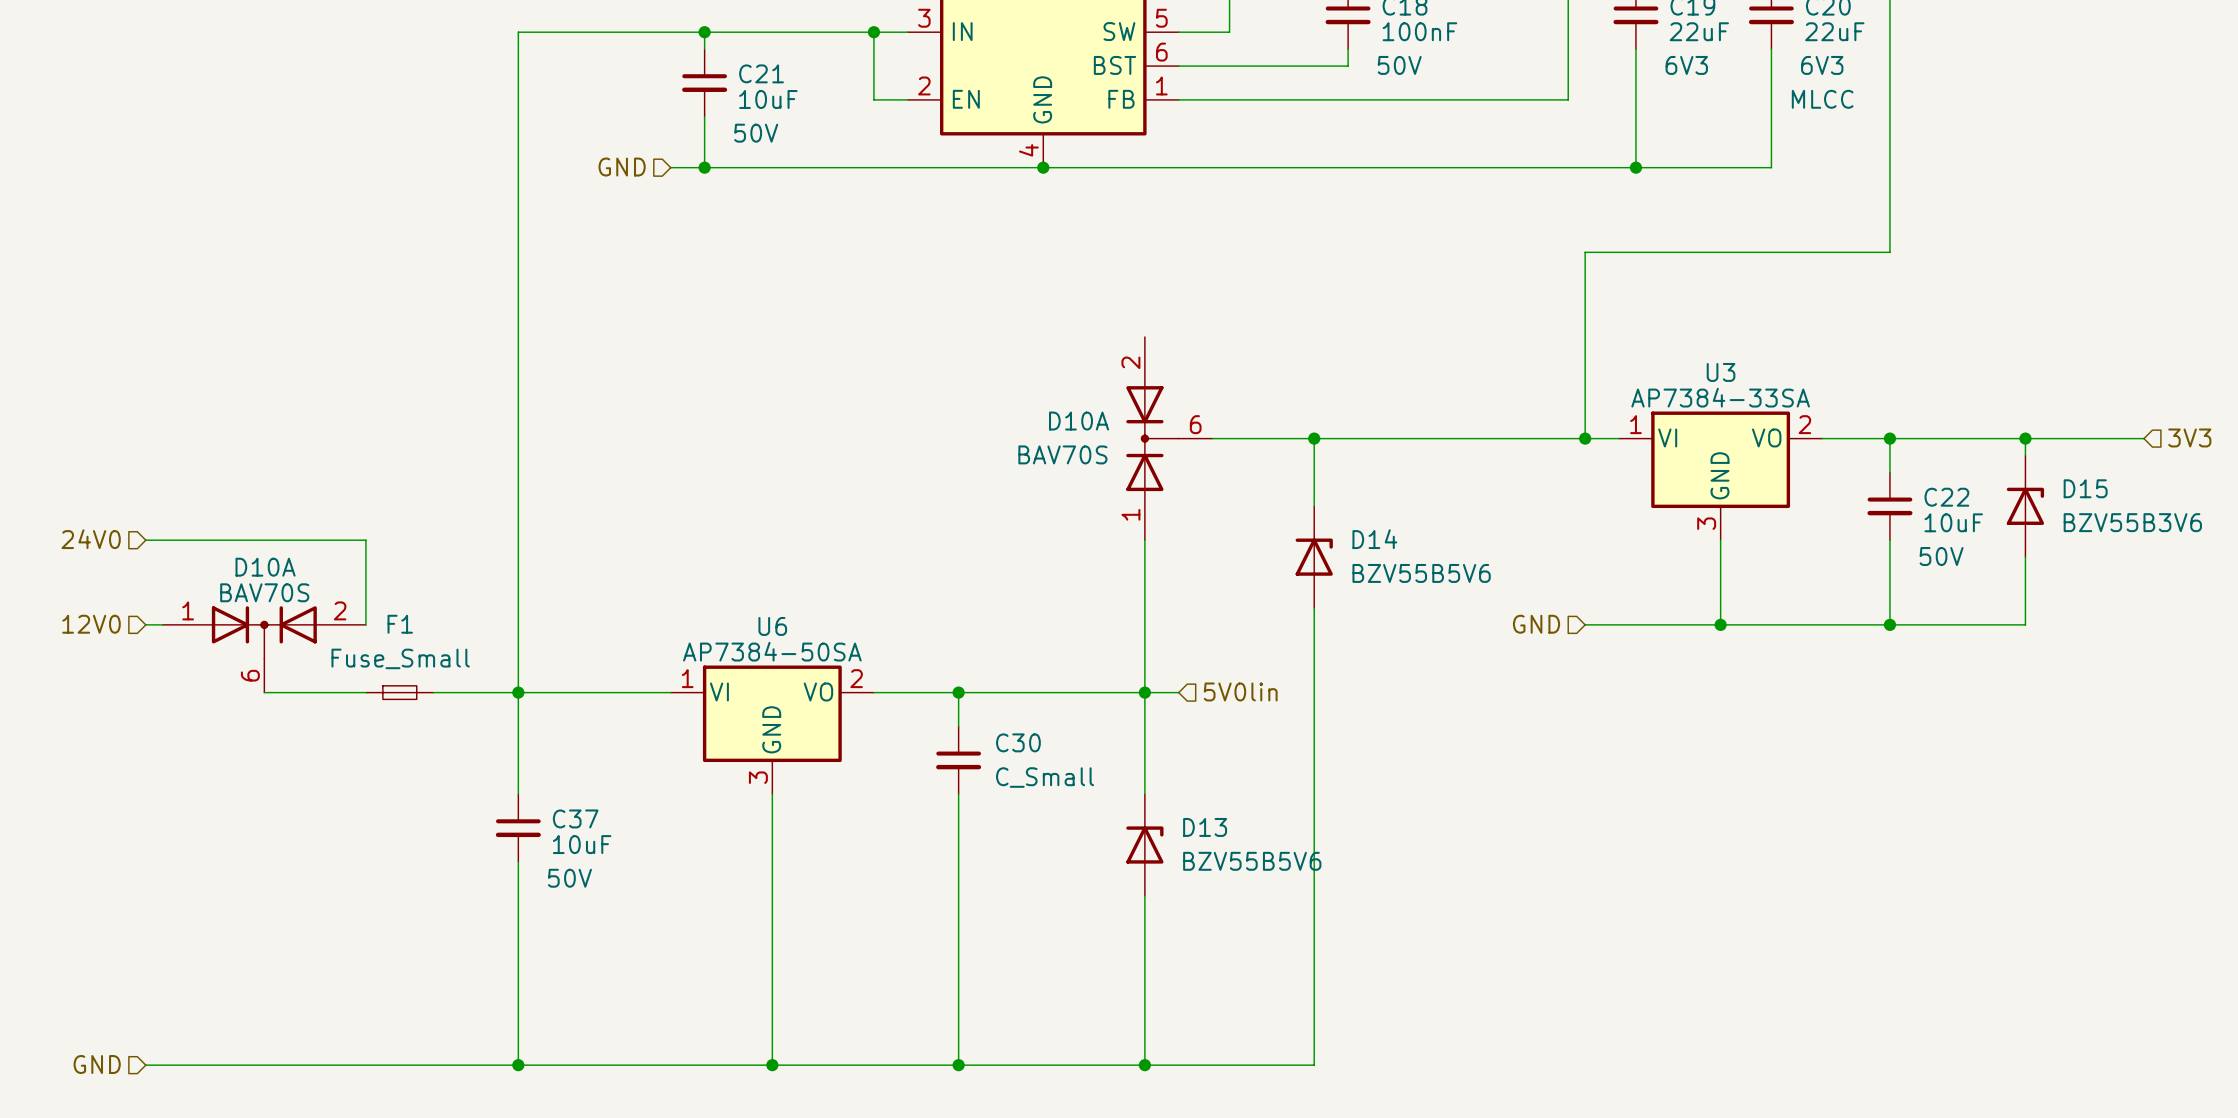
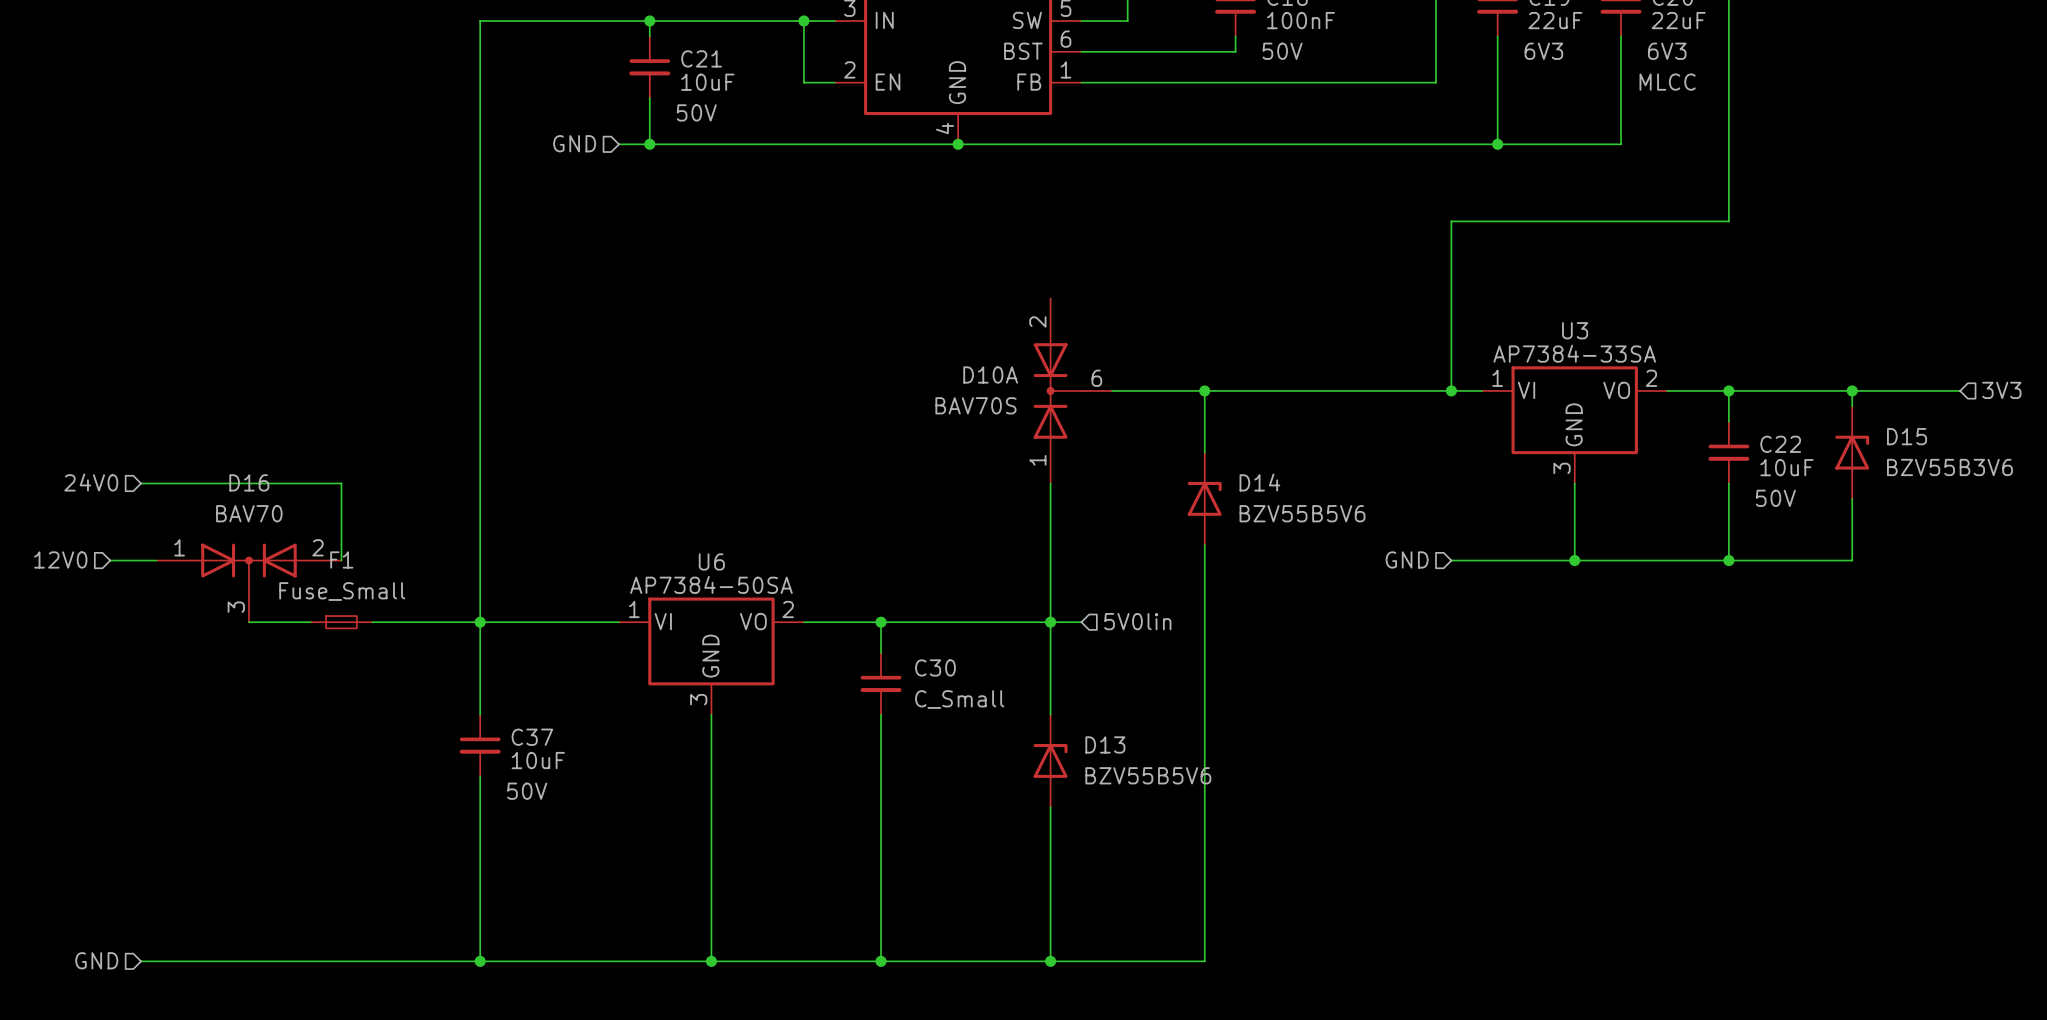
D10A name: D10A (265, 567) -> D16 (249, 482)
D10A value: BAV70S (264, 592) -> BAV70 (249, 513)
hierarchical label position: 12V0 (91, 624) -> 12V0 (60, 559)
wire: none -> (110, 560) (141, 560)
D10A pin number: 6 (250, 675) -> 3 (236, 607)
F1 position: (399, 692) -> (341, 622)

